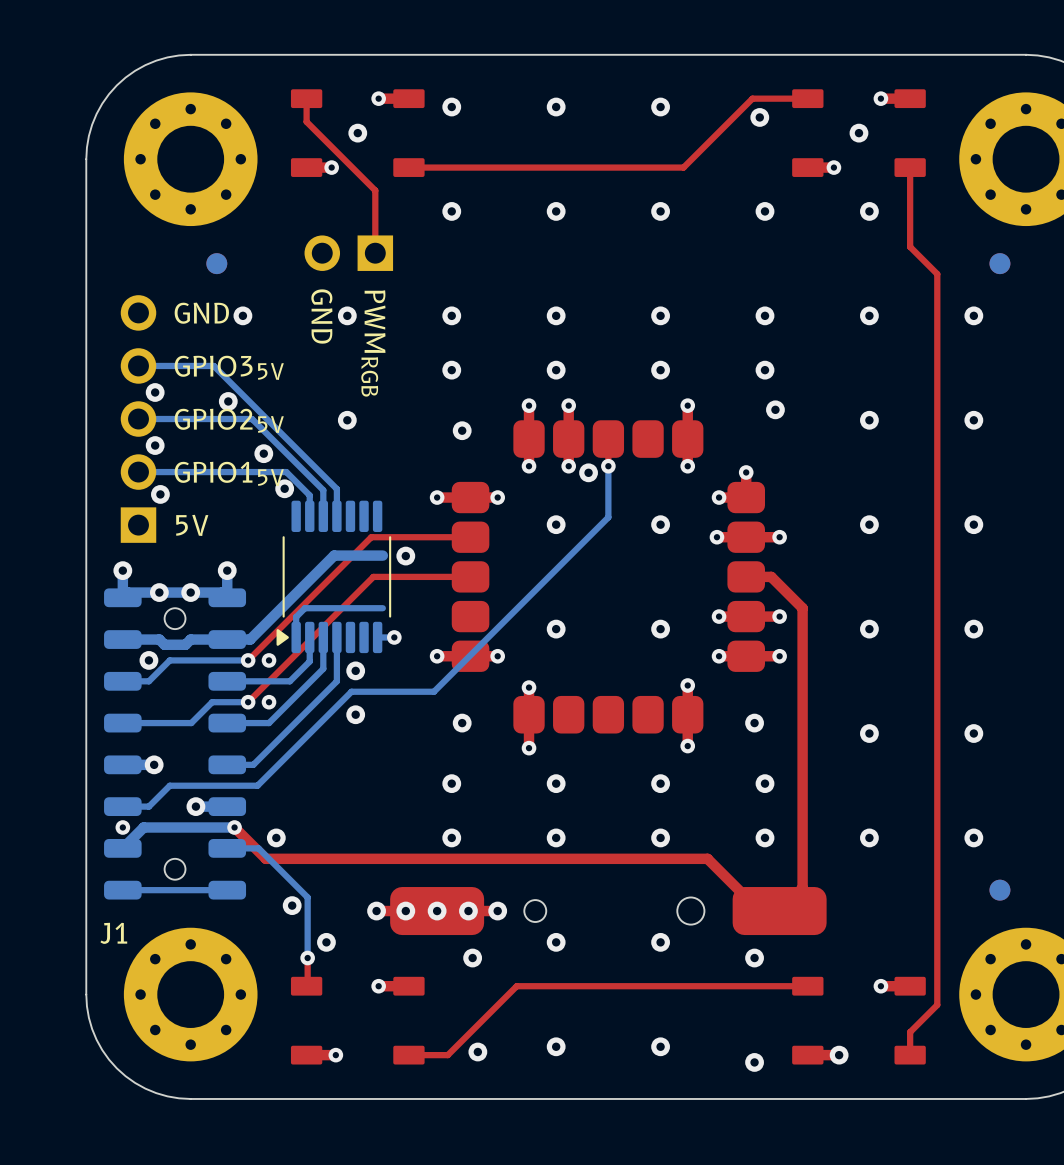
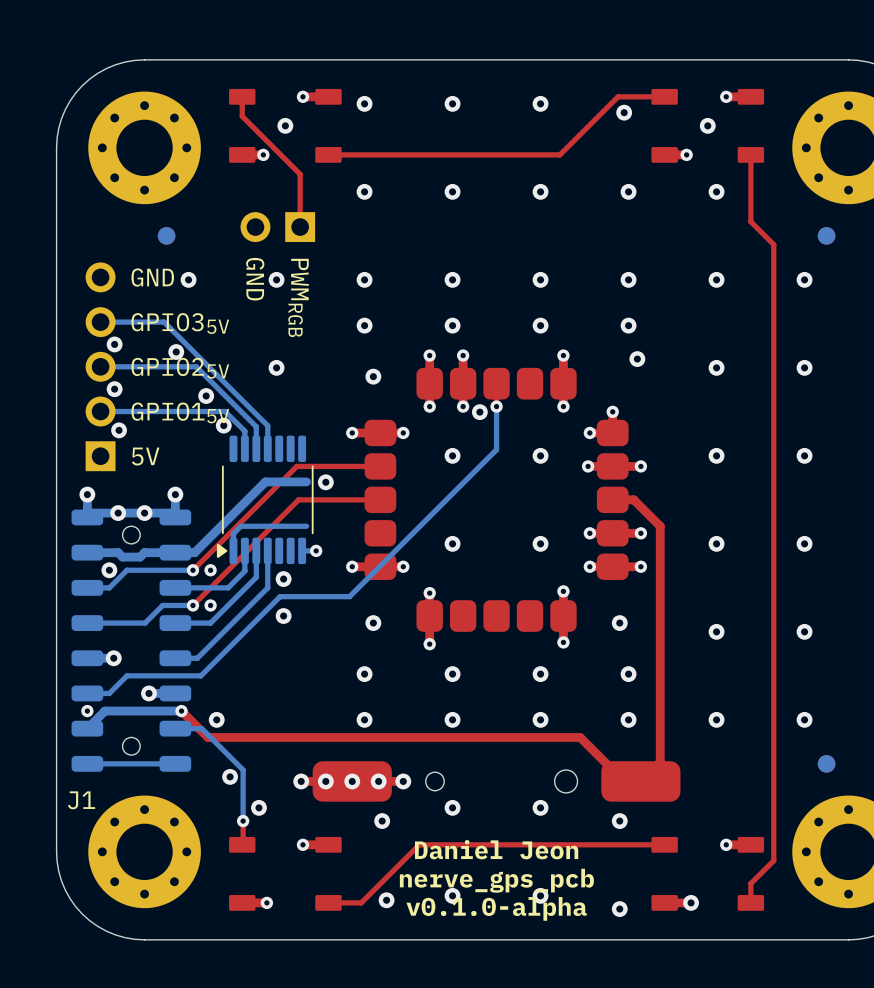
text: none -> Daniel Jeon (496, 849)
text: none -> nerve_gps_pcb (496, 880)
text: none -> v0.1.0-alpha (496, 908)

